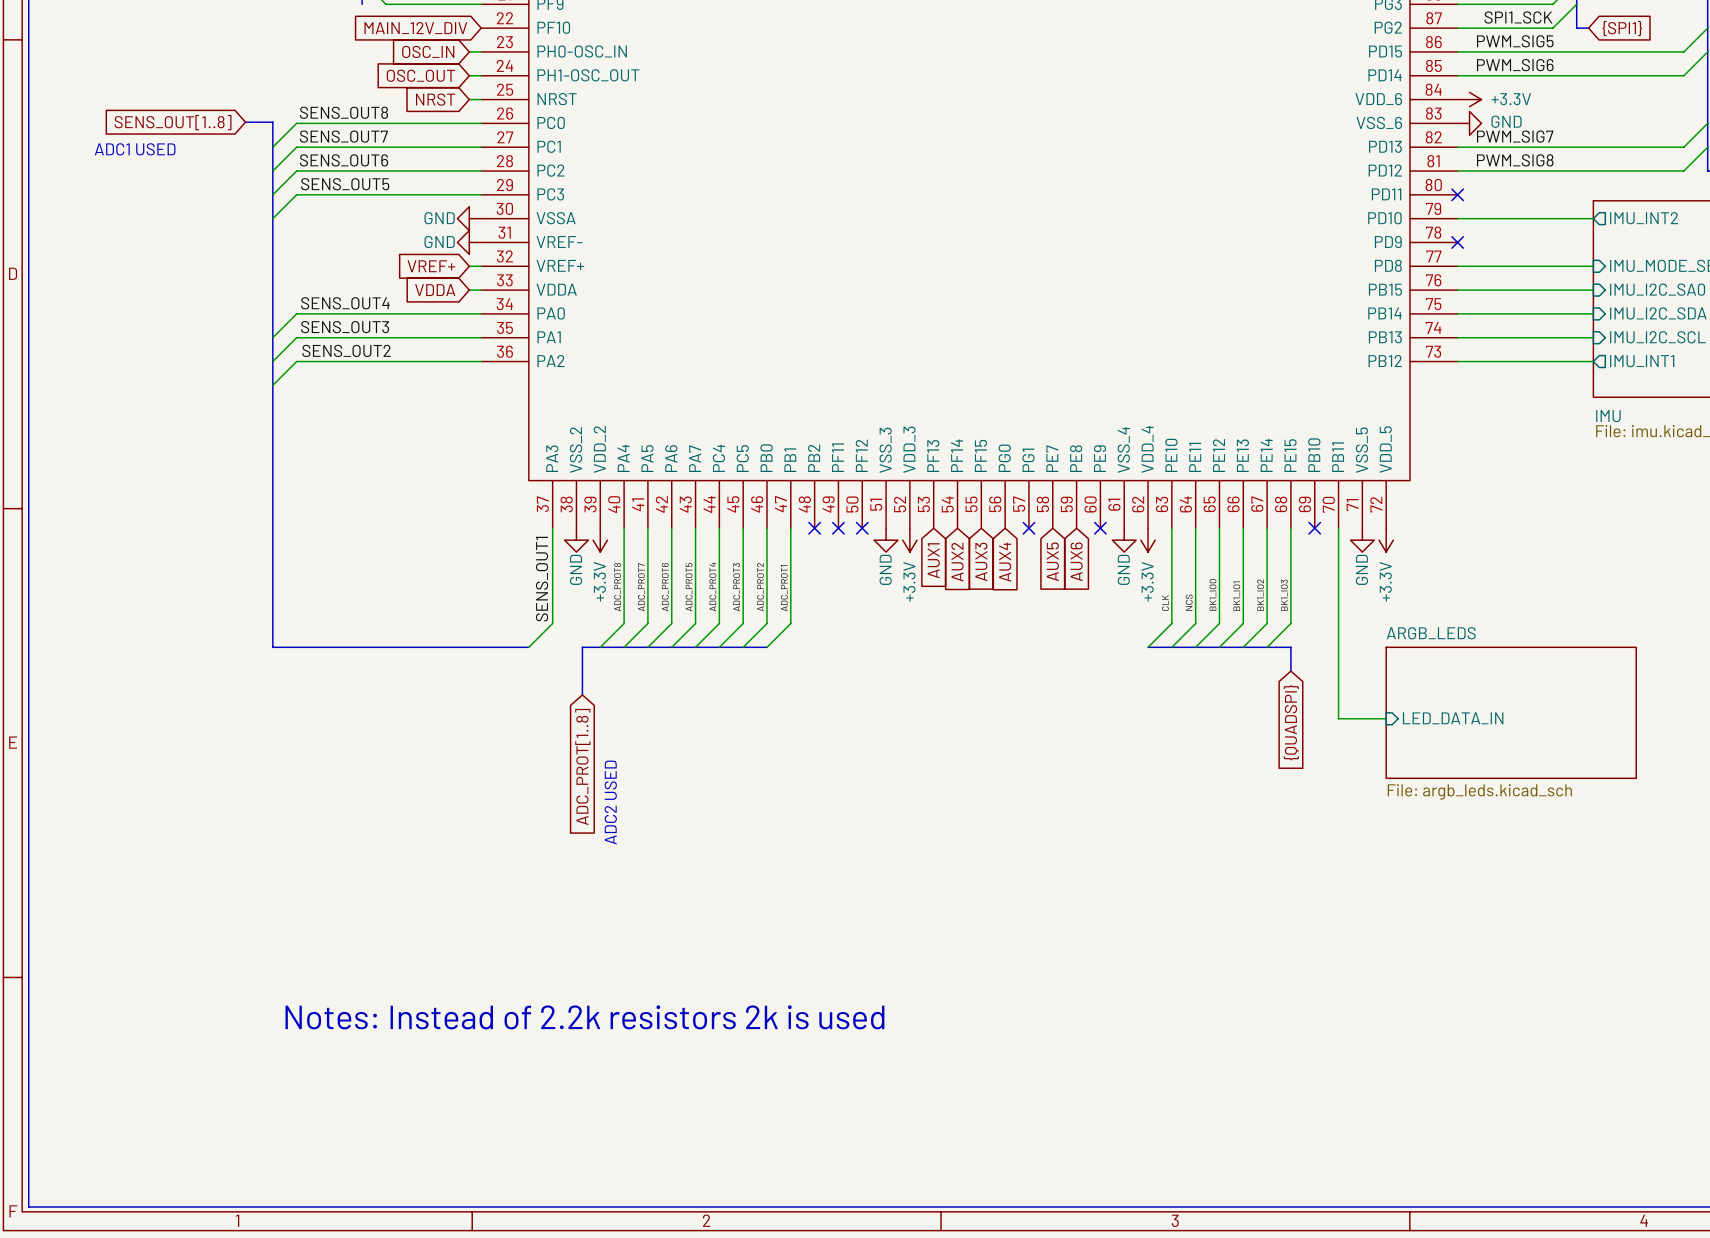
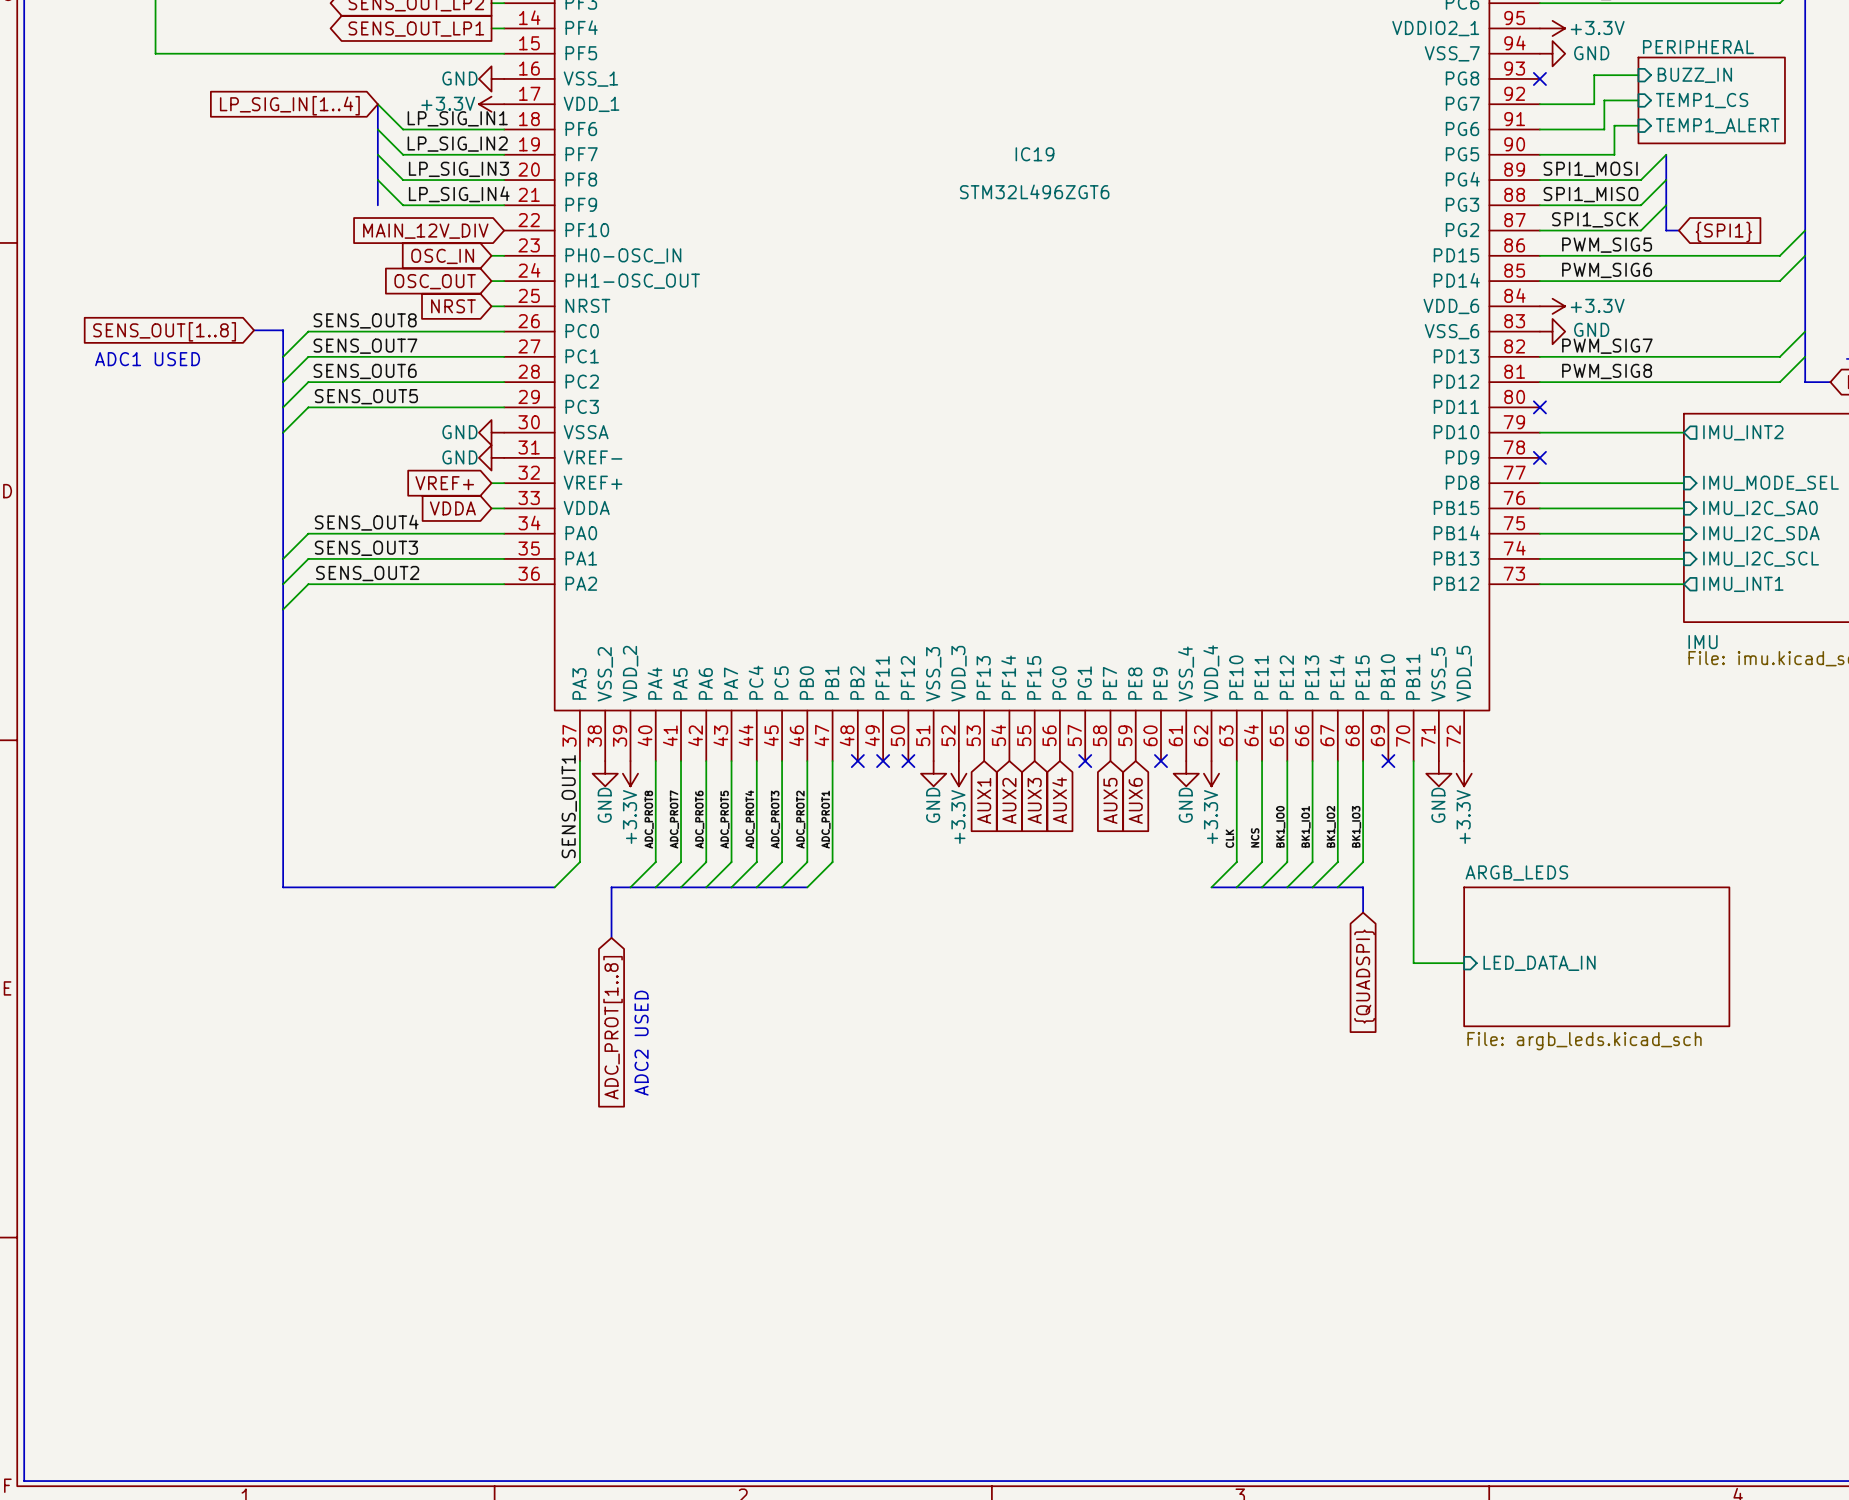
text: Notes: Instead of 2.2k resistors 2k is used (584, 1017) -> none

